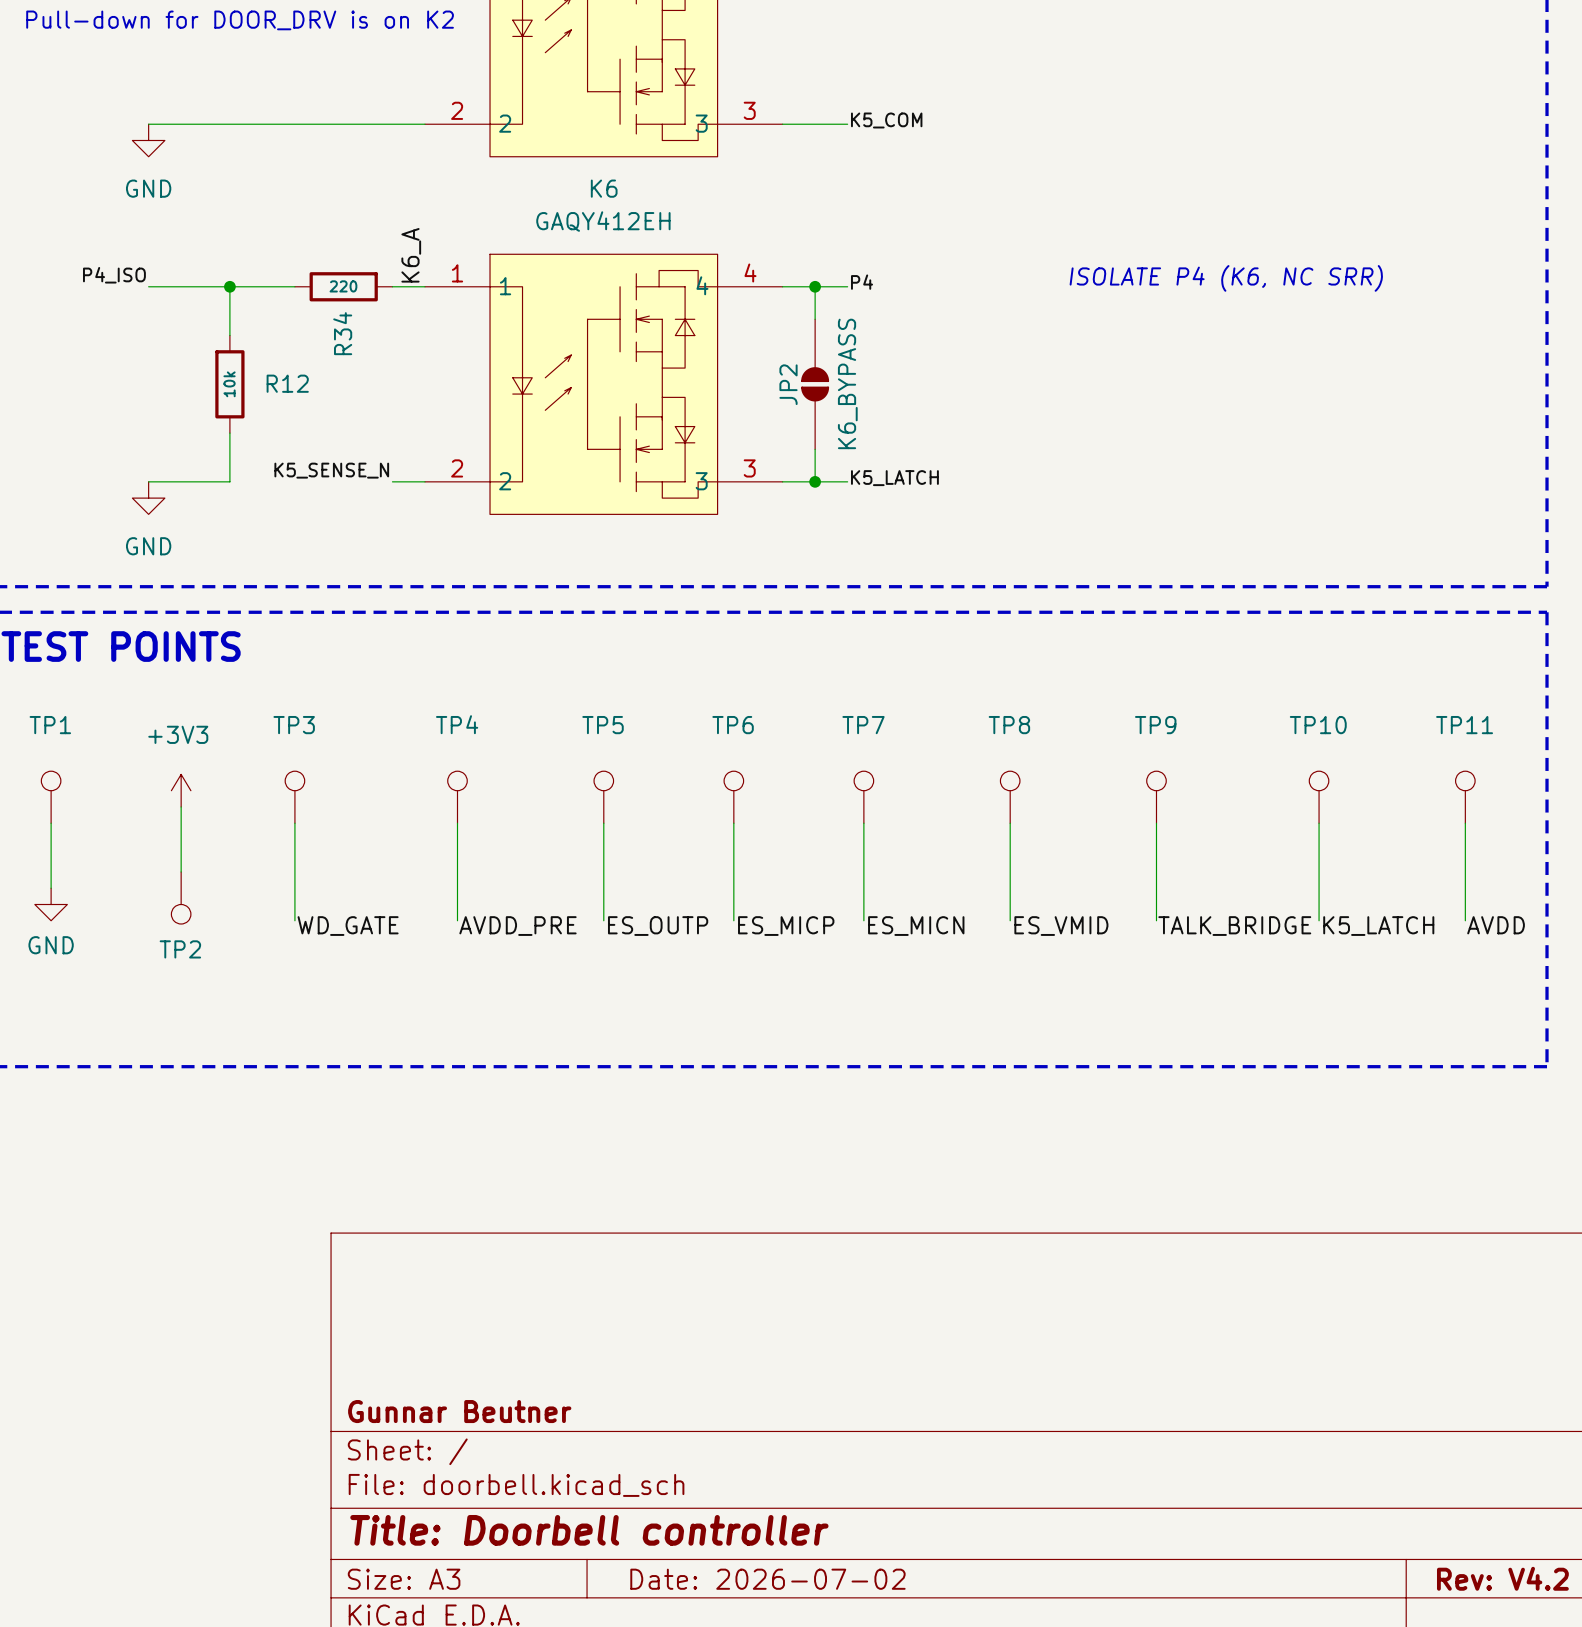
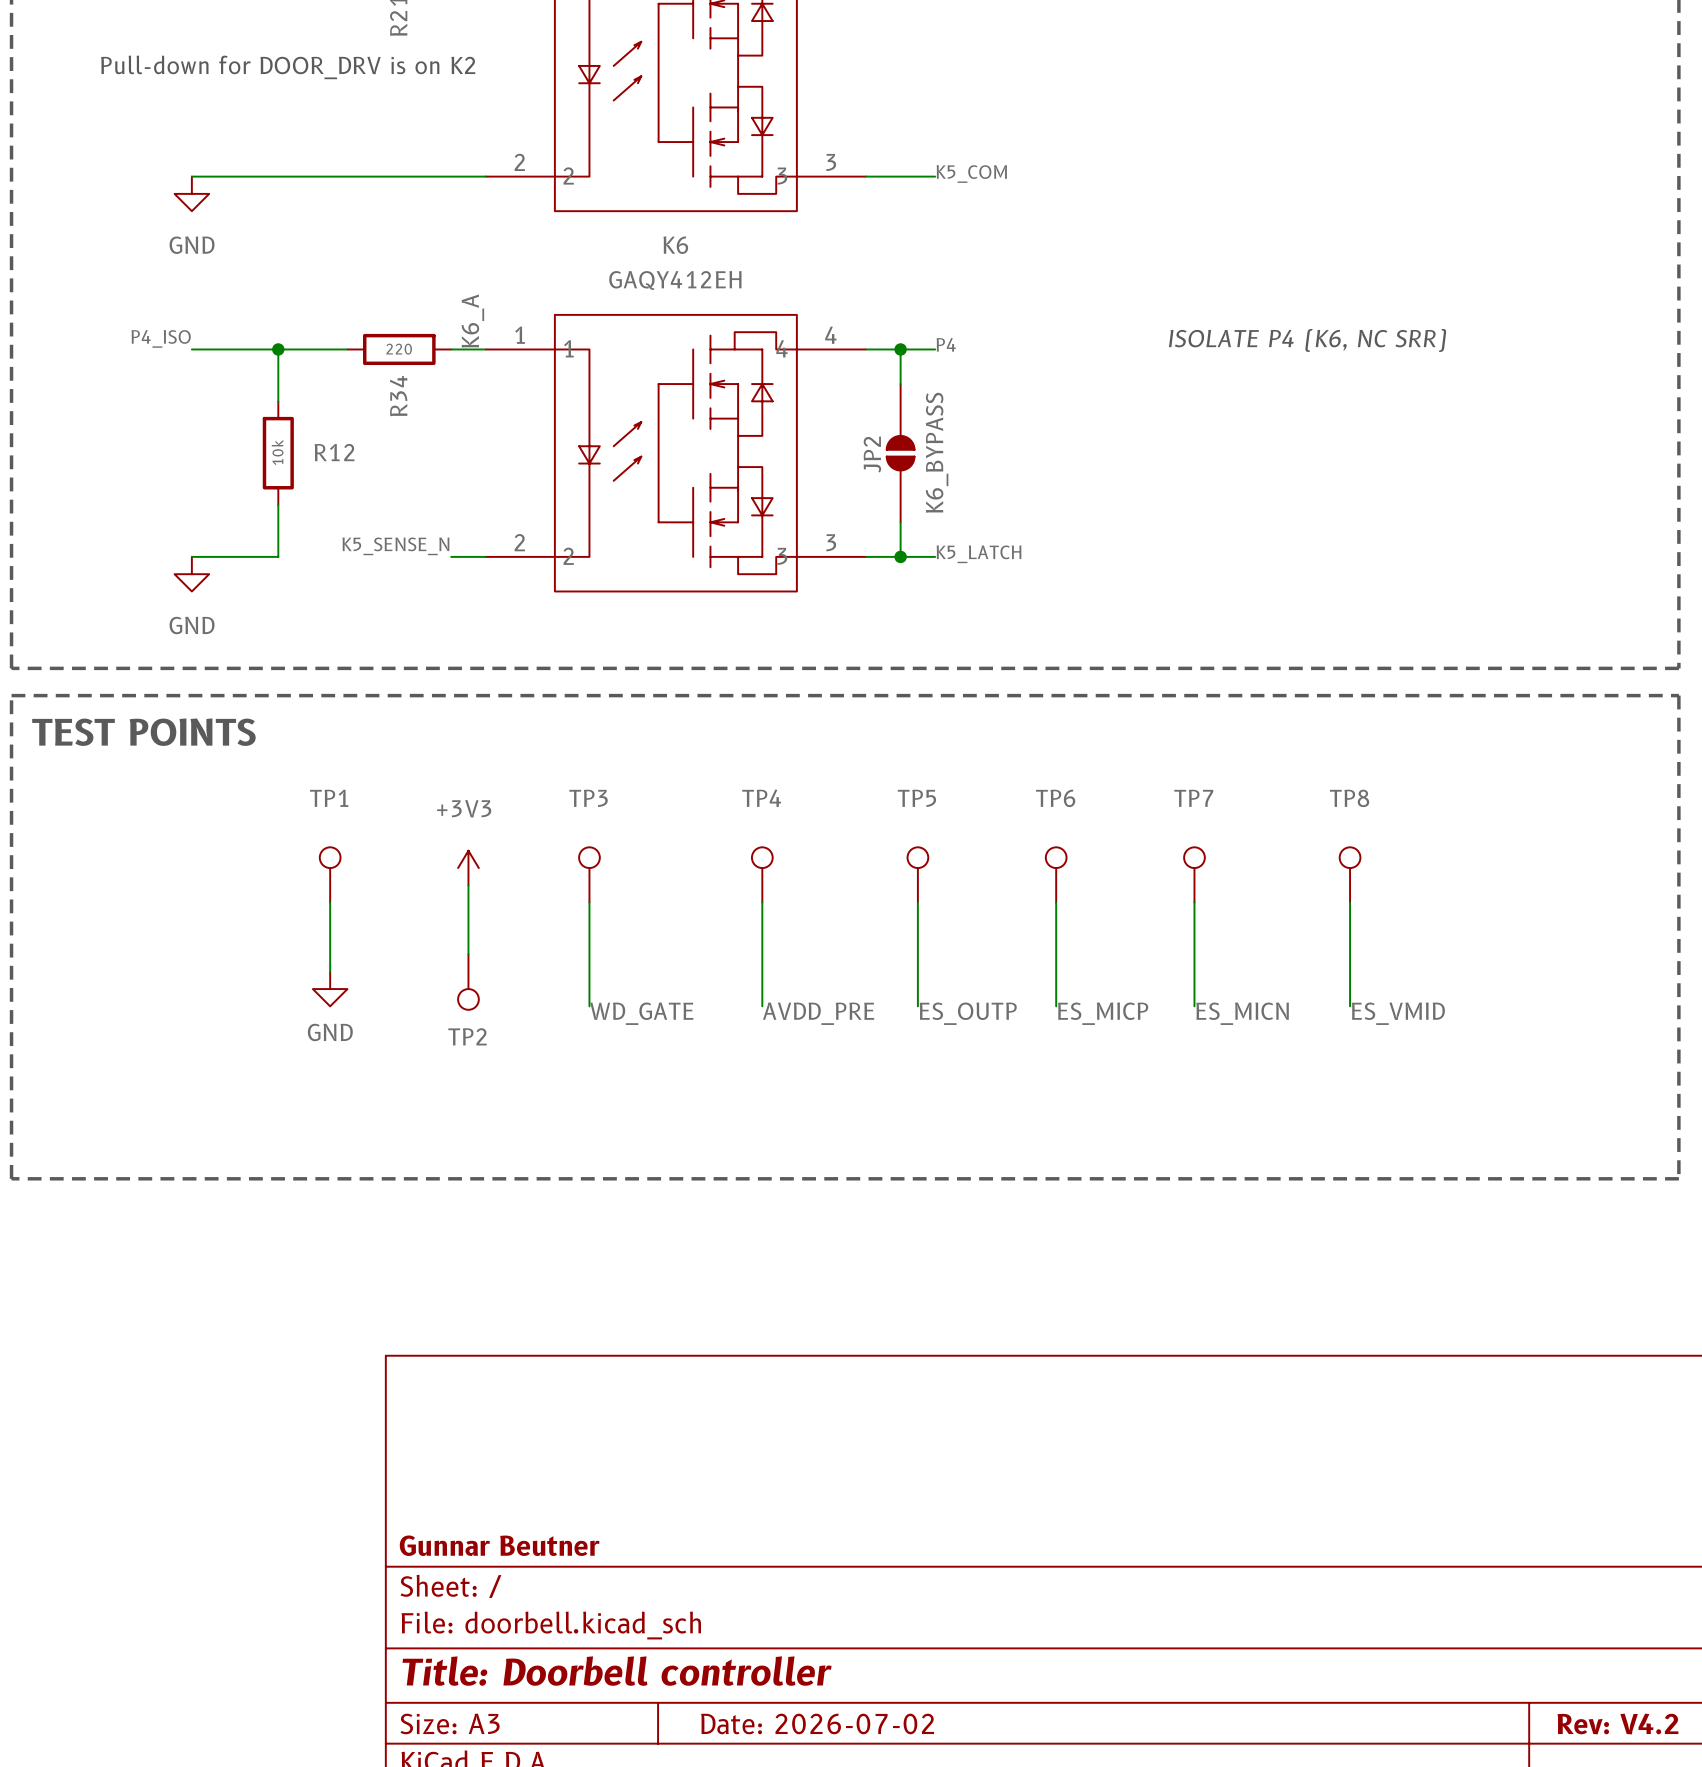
power symbol position: +3V3 (181, 790) -> +3V3 (468, 868)
TP1 position: (51, 797) -> (330, 874)
TP3 position: (294, 797) -> (589, 874)
TP4 position: (457, 797) -> (762, 874)
TP5 position: (603, 797) -> (917, 874)
TP6 position: (733, 797) -> (1056, 874)
TP7 position: (863, 797) -> (1194, 874)
TP8 position: (1010, 797) -> (1350, 874)
TP9: (1156, 797) -> none
TP10: (1319, 797) -> none
TP11: (1465, 797) -> none
wire: (181, 806) (181, 871) -> (468, 885) (468, 954)
wire: (51, 823) (51, 888) -> (330, 902) (330, 971)
wire: (294, 823) (294, 920) -> (589, 902) (589, 1006)
wire: (457, 823) (457, 920) -> (762, 902) (762, 1006)
wire: (603, 823) (603, 920) -> (917, 902) (917, 1006)
wire: (733, 823) (733, 920) -> (1056, 902) (1056, 1006)
wire: (863, 823) (863, 920) -> (1194, 902) (1194, 1006)
wire: (1010, 823) (1010, 920) -> (1350, 902) (1350, 1006)
wire: (1156, 823) (1156, 920) -> none
wire: (1319, 823) (1319, 920) -> none
wire: (1465, 823) (1465, 920) -> none
TP2 position: (181, 898) -> (468, 982)
power symbol position: GND (51, 904) -> GND (330, 989)
label: AVDD (1496, 925) -> none
label position: WD_GATE (348, 926) -> WD_GATE (641, 1013)
label position: AVDD_PRE (517, 926) -> AVDD_PRE (818, 1013)
label position: ES_OUTP (658, 926) -> ES_OUTP (968, 1013)
label position: ES_MICP (786, 926) -> ES_MICP (1103, 1013)
label position: ES_MICN (916, 926) -> ES_MICN (1242, 1013)
label position: ES_VMID (1061, 926) -> ES_VMID (1398, 1013)
label: TALK_BRIDGE (1234, 926) -> none
label: K5_LATCH (1378, 926) -> none

